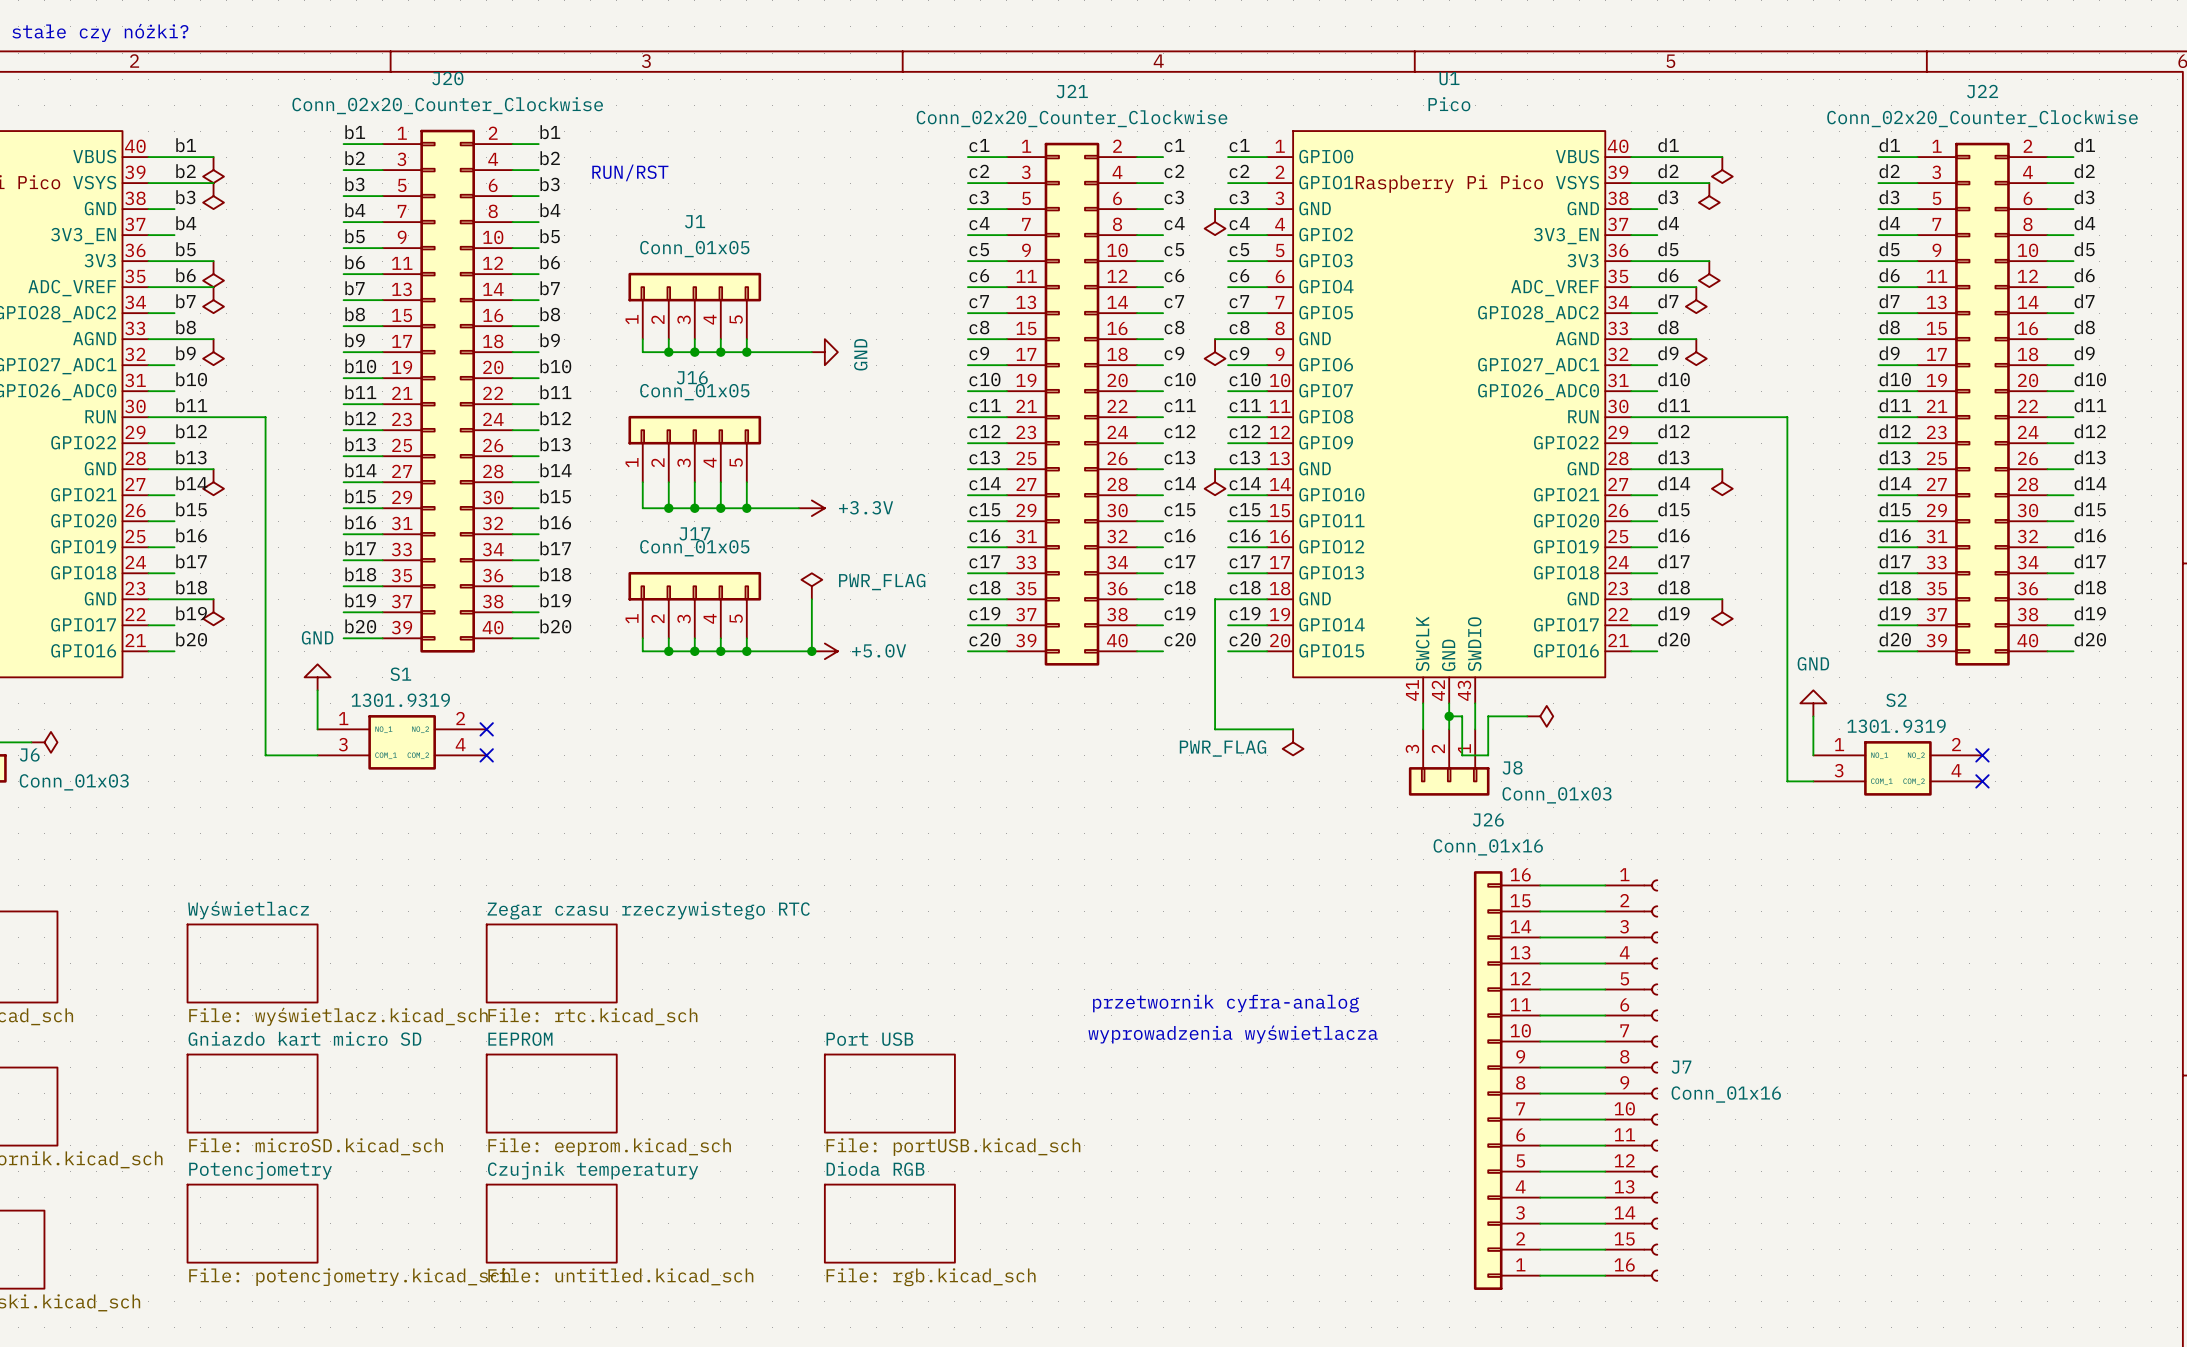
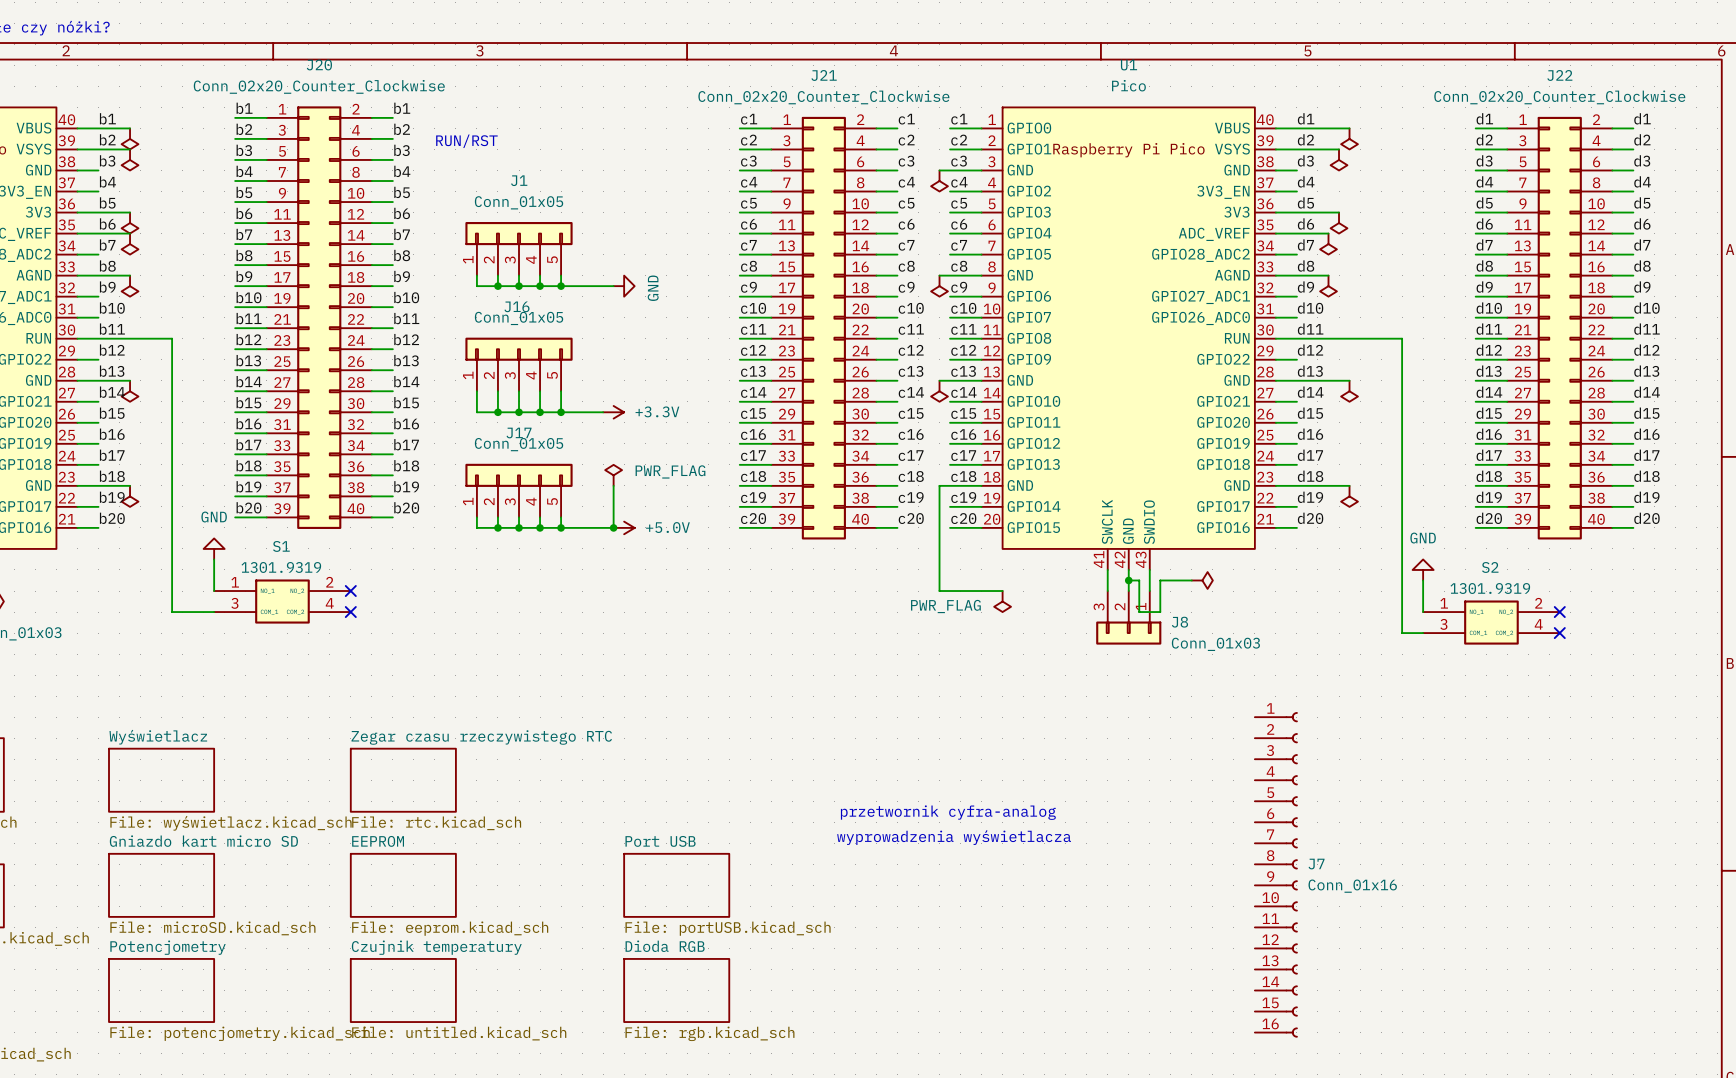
wire: (1540, 885) (1605, 885) -> none
wire: (1540, 911) (1605, 911) -> none
wire: (1540, 937) (1605, 937) -> none
wire: (1540, 963) (1605, 963) -> none
wire: (1540, 989) (1605, 989) -> none
wire: (1540, 1015) (1605, 1015) -> none
wire: (1540, 1041) (1605, 1041) -> none
wire: (1540, 1067) (1605, 1067) -> none
J26: Conn_01x16 (1507, 1080) -> none
wire: (1540, 1093) (1605, 1093) -> none
wire: (1540, 1119) (1605, 1119) -> none
wire: (1540, 1145) (1605, 1145) -> none
wire: (1540, 1171) (1605, 1171) -> none
wire: (1540, 1197) (1605, 1197) -> none
wire: (1540, 1223) (1605, 1223) -> none
wire: (1540, 1249) (1605, 1249) -> none
wire: (1540, 1275) (1605, 1275) -> none

